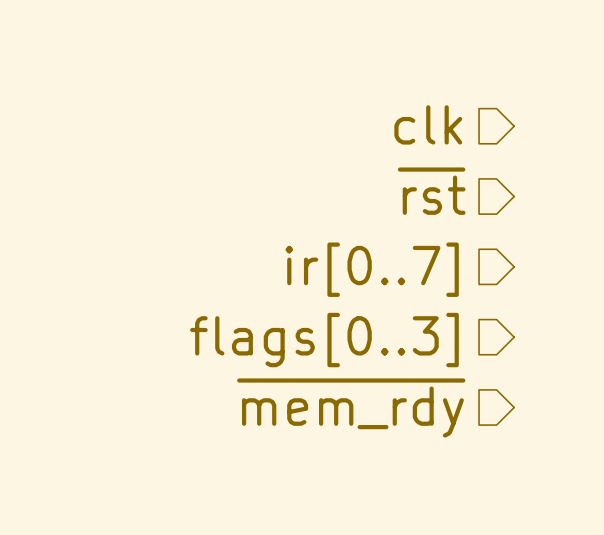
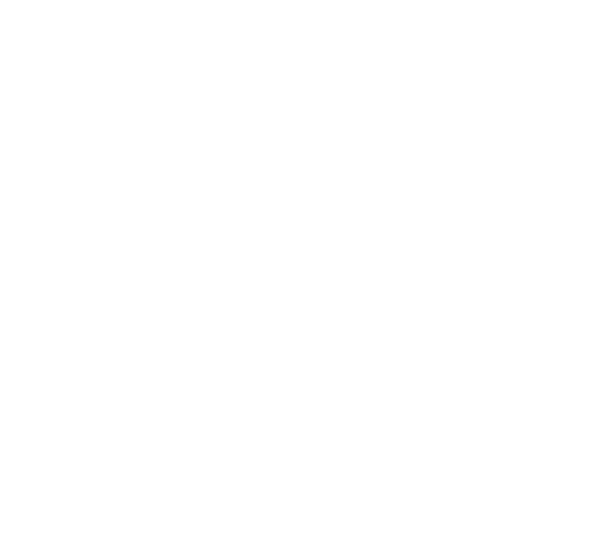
hierarchical label: clk (428, 124) -> none
hierarchical label: ~{rst} (431, 191) -> none
hierarchical label: ir[0..7] (372, 269) -> none
hierarchical label: flags[0..3] (324, 340) -> none
hierarchical label: ~{mem_rdy} (351, 407) -> none

